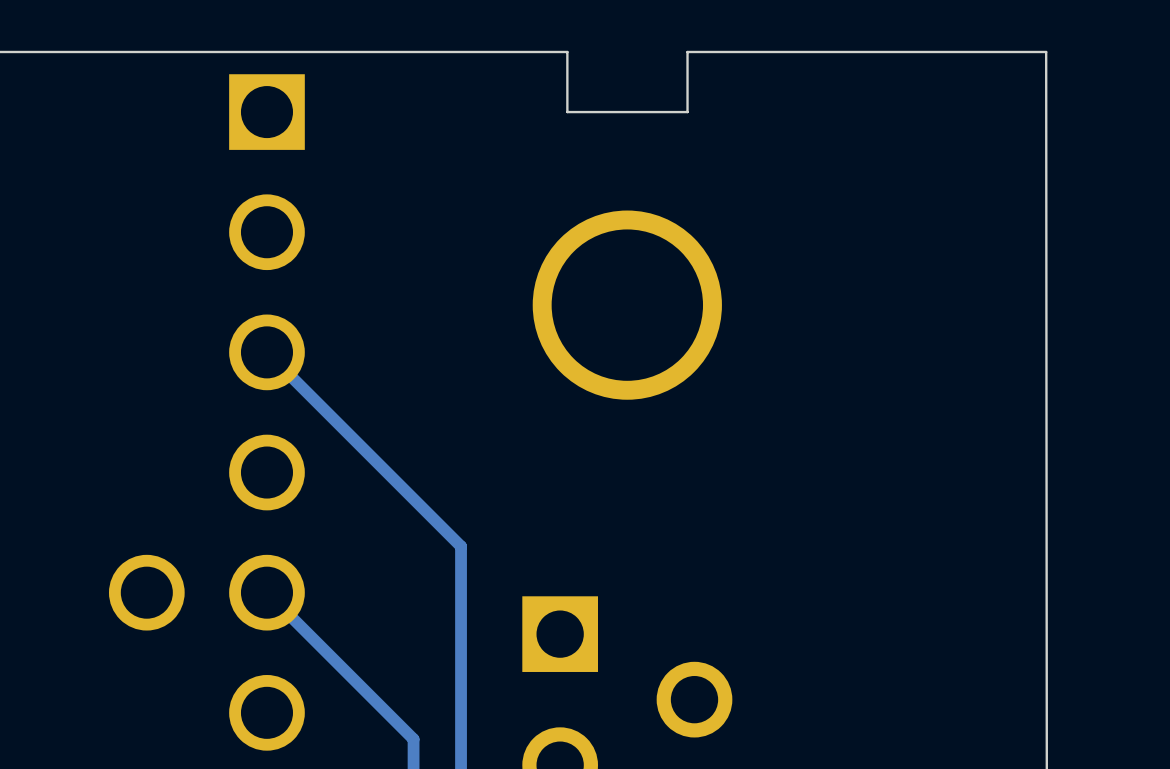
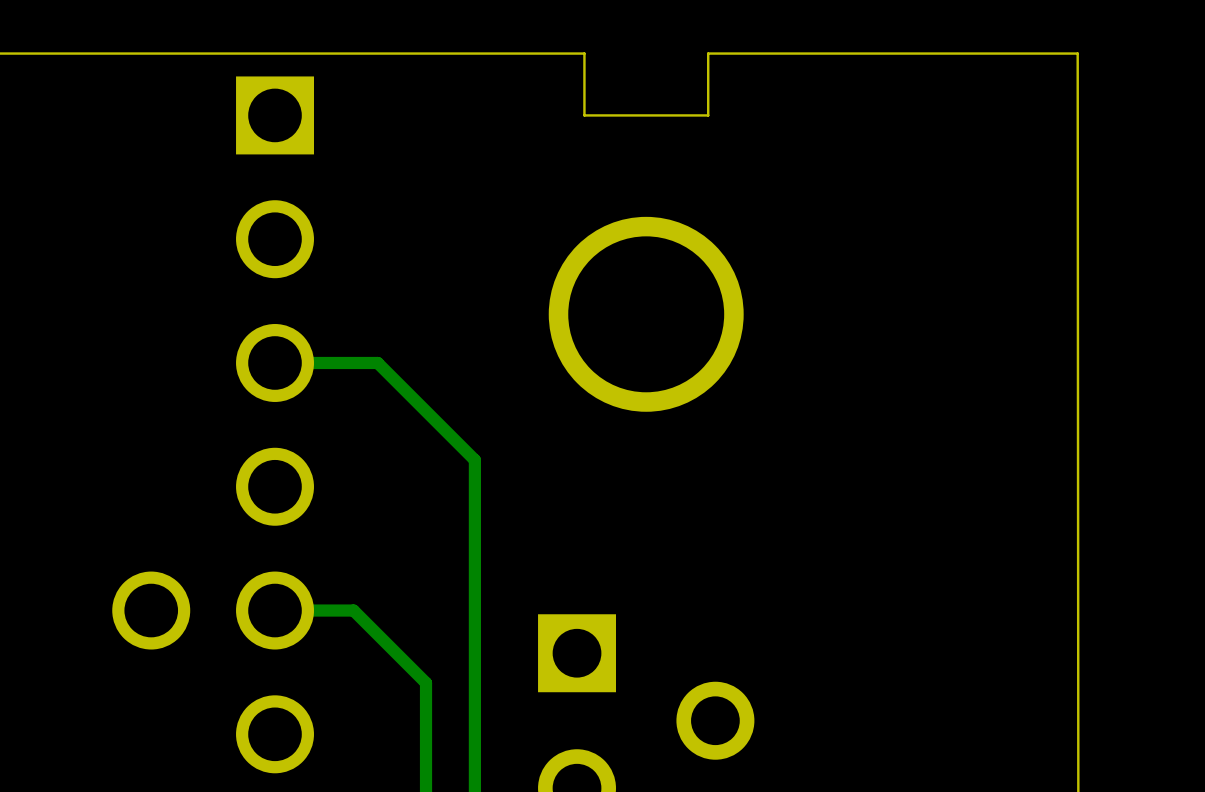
track: (266, 352) (461, 546) -> (275, 362) (377, 362) (474, 460) (474, 562)
track: (266, 592) (413, 739) -> (275, 610) (353, 610) (426, 682) (426, 761)

